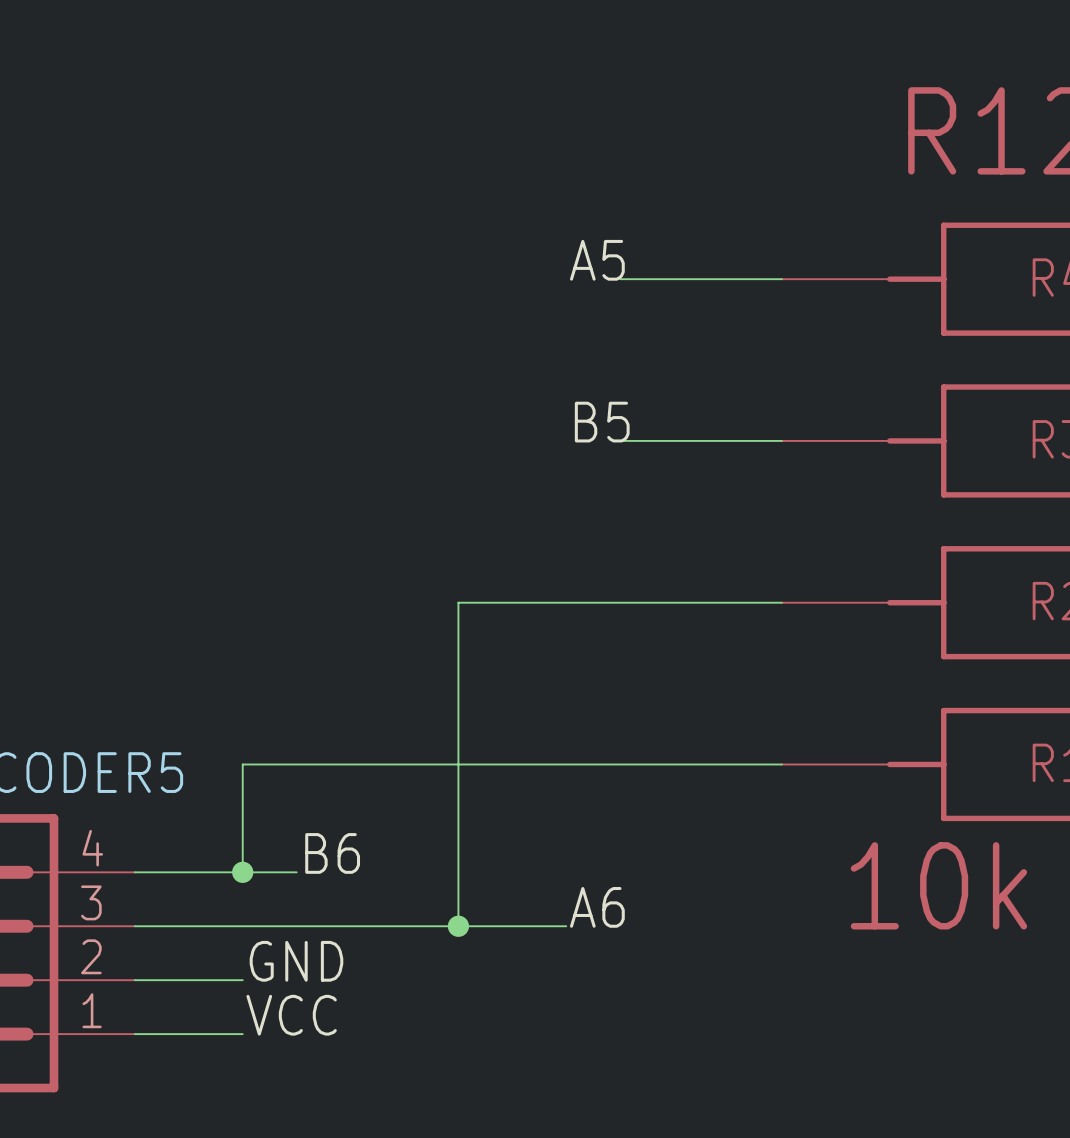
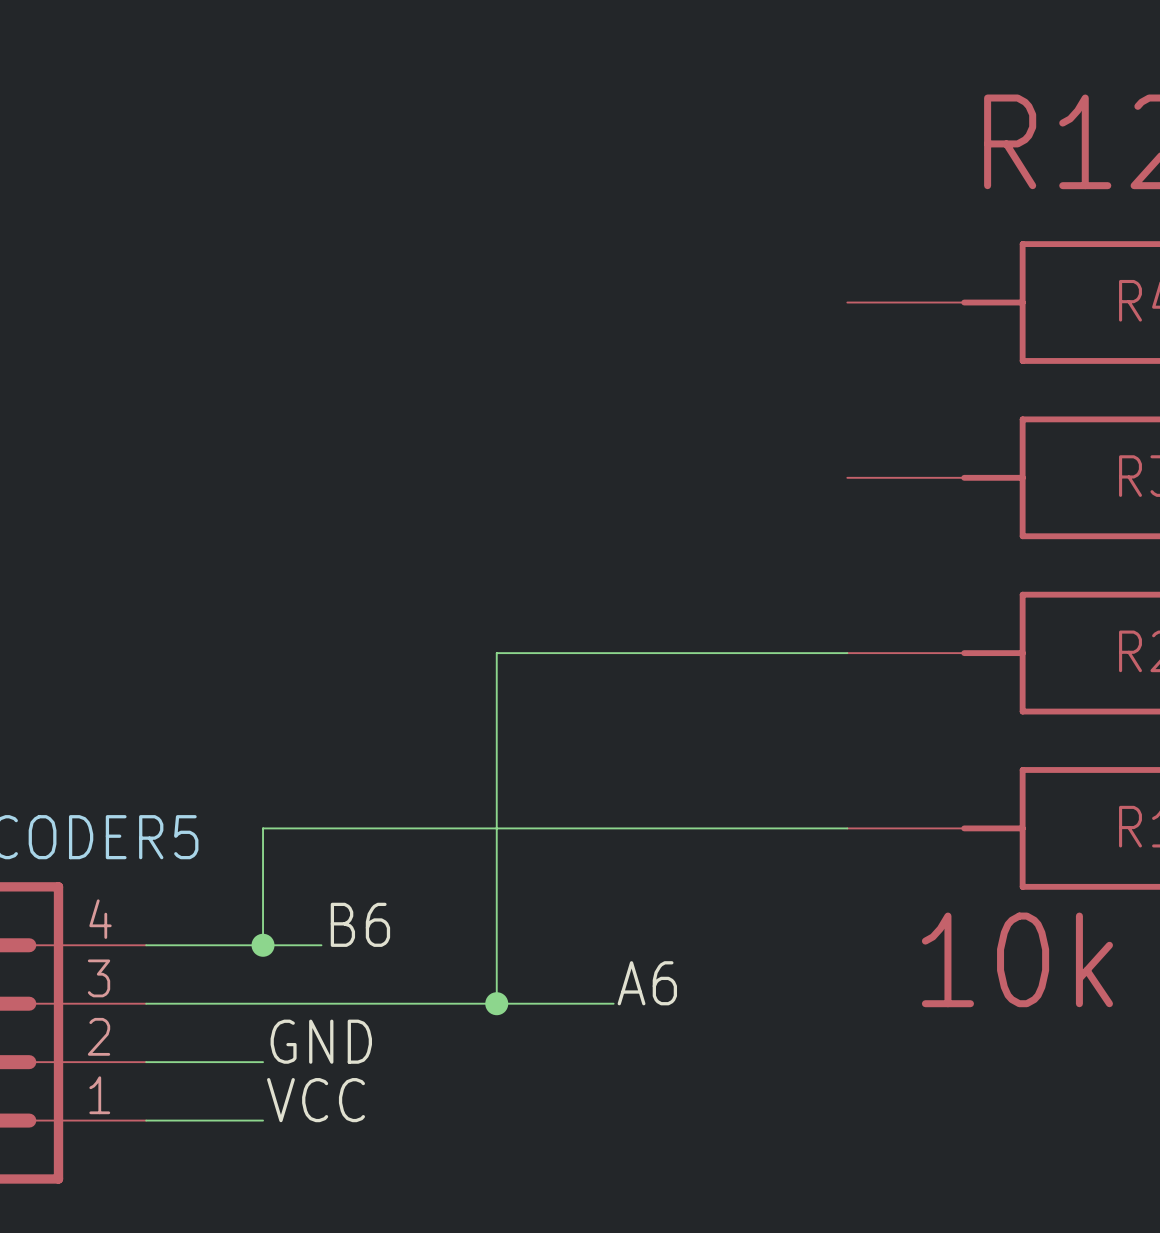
label: A5 (597, 260) -> none
wire: (620, 279) (781, 279) -> none
label: B5 (602, 422) -> none
wire: (620, 440) (781, 440) -> none

